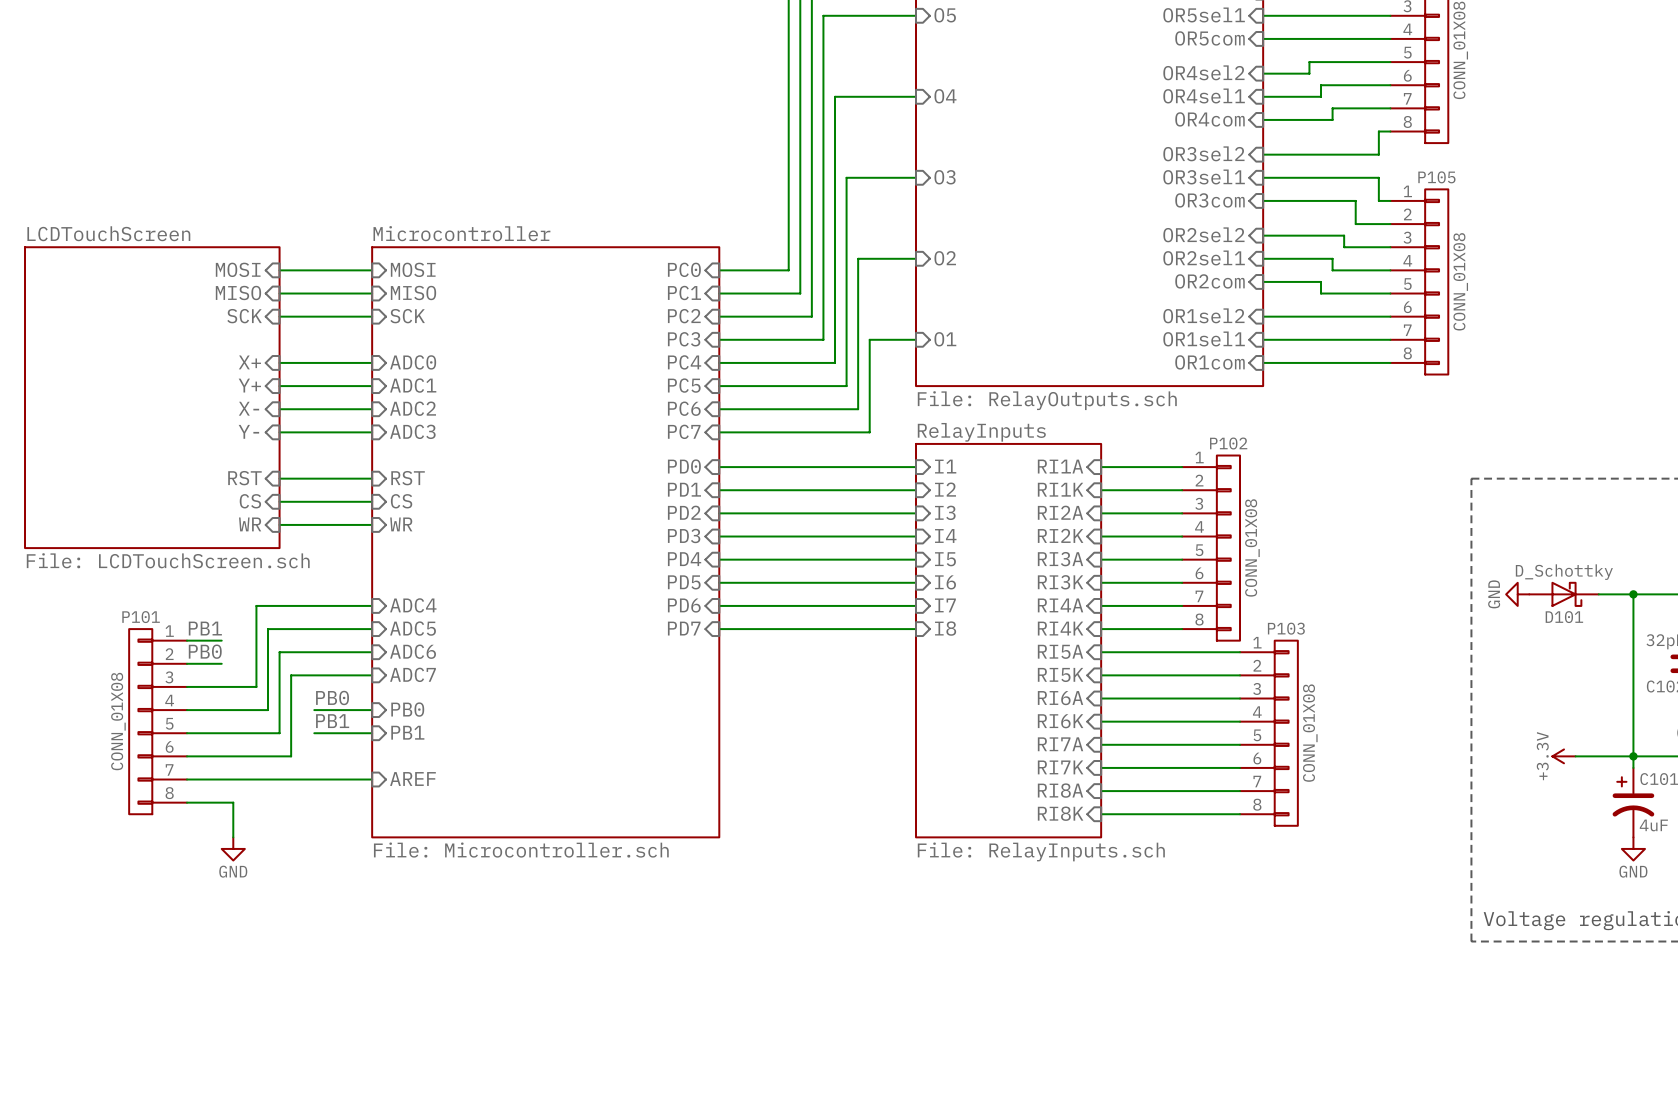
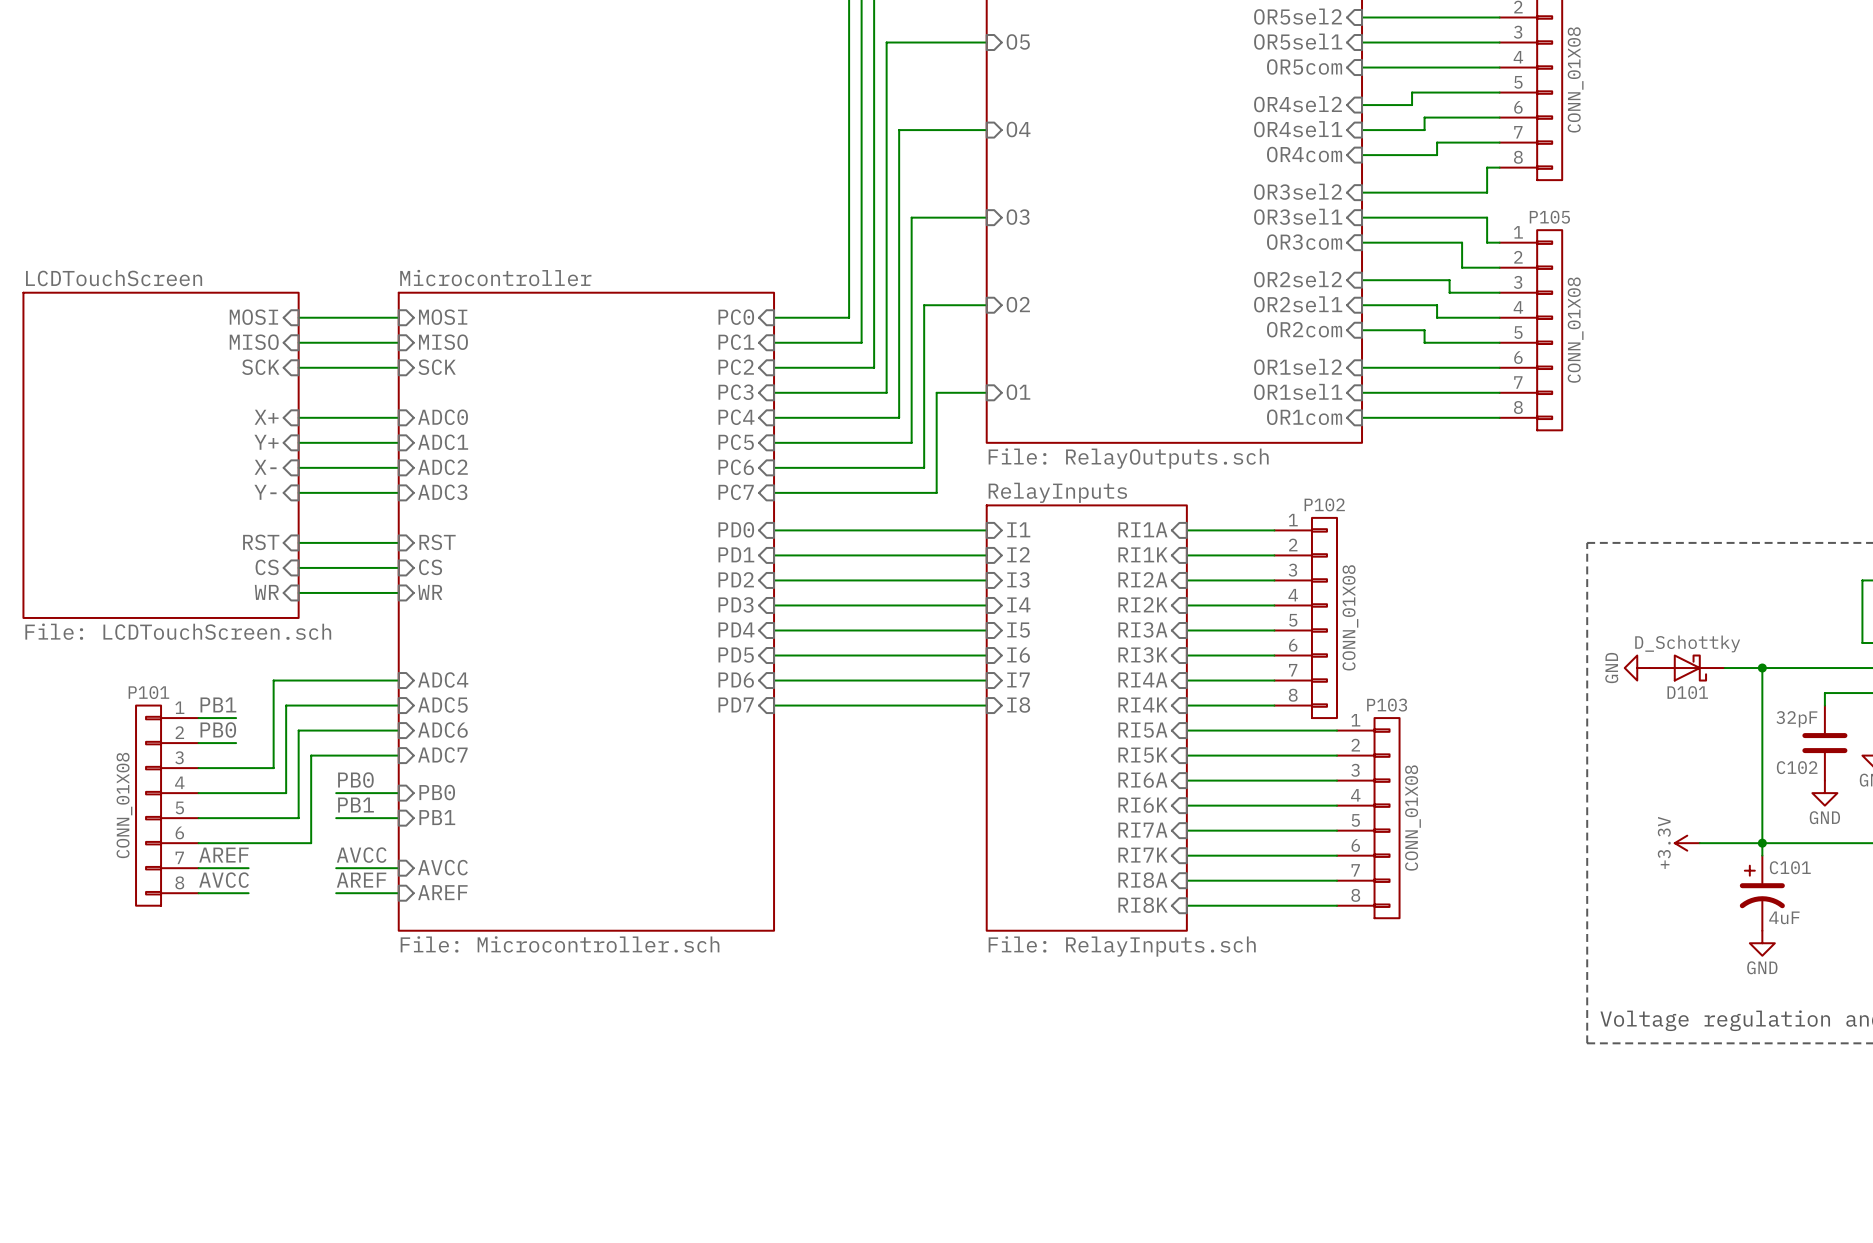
label: none -> AREF (223, 855)
label: none -> AVCC (361, 855)
sheet pin: AREF (412, 778) -> AVCC (442, 867)
wire: (233, 779) (314, 779) -> none
label: none -> AVCC (224, 880)
label: none -> AREF (361, 880)
wire: (233, 802) (233, 837) -> none
wire: none -> (336, 893) (398, 893)
sheet pin: none -> AREF (442, 892)
power symbol: GND (233, 848) -> none

